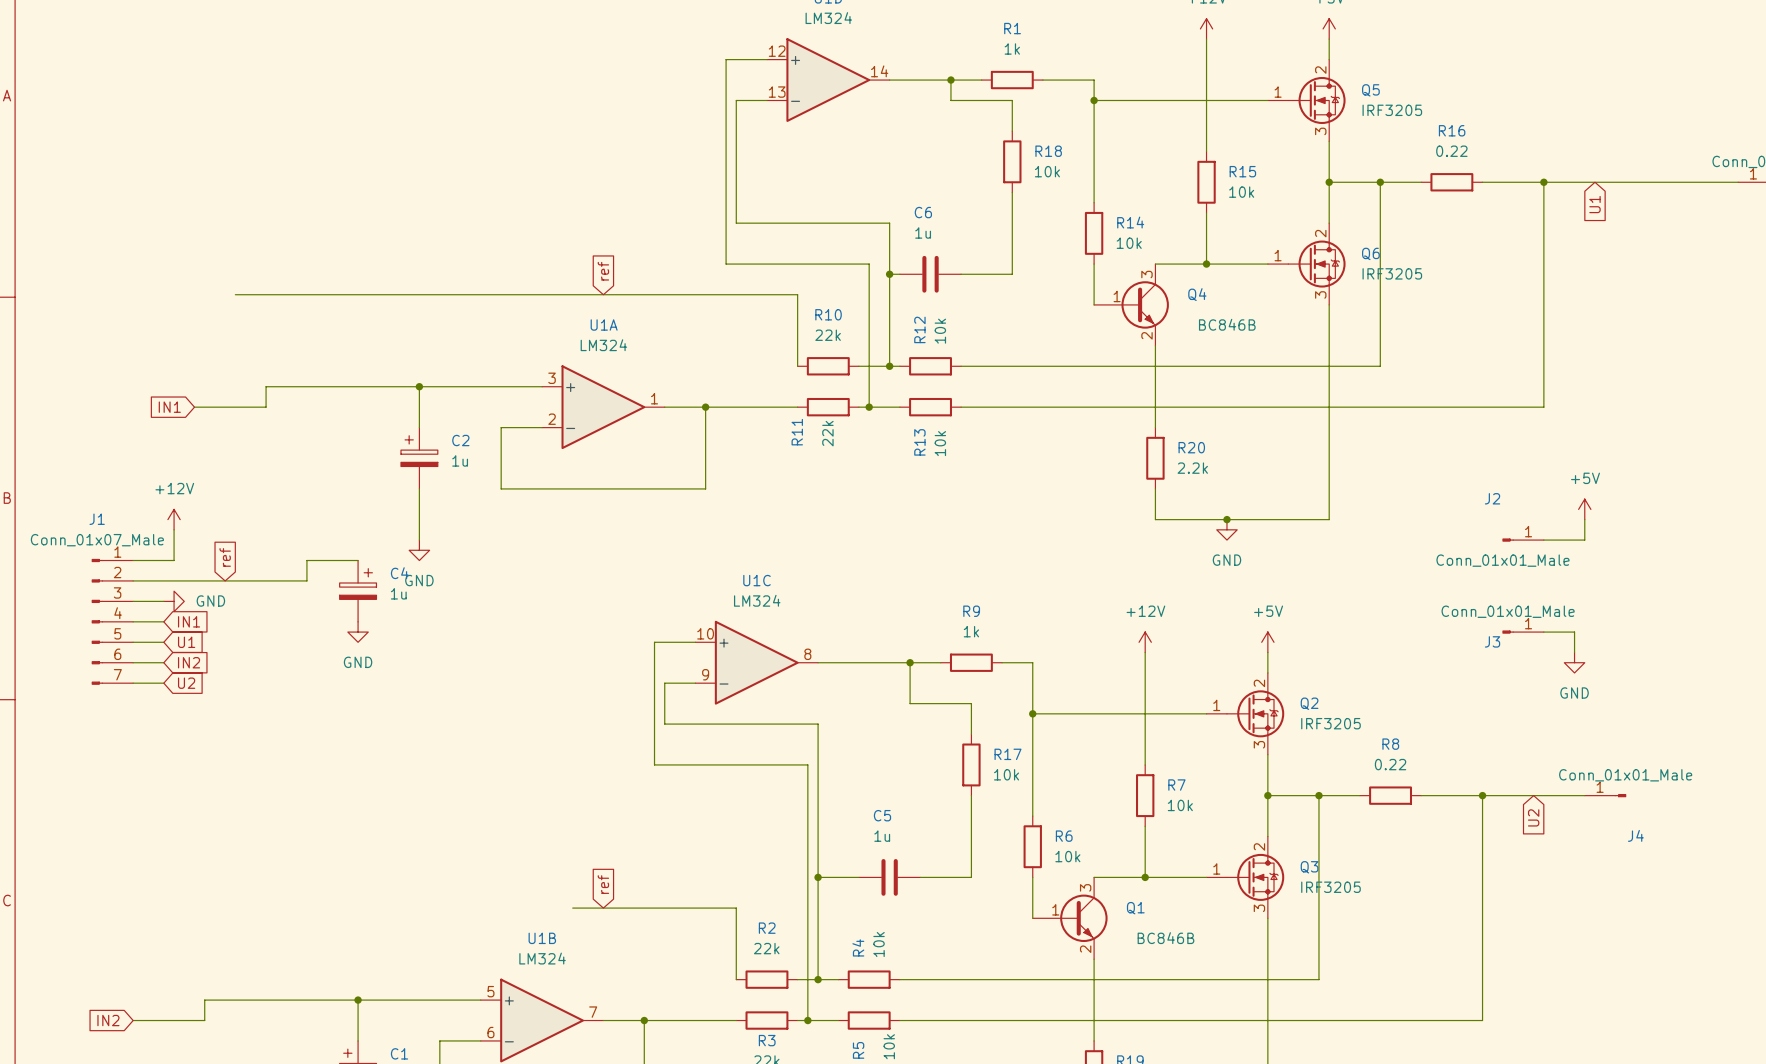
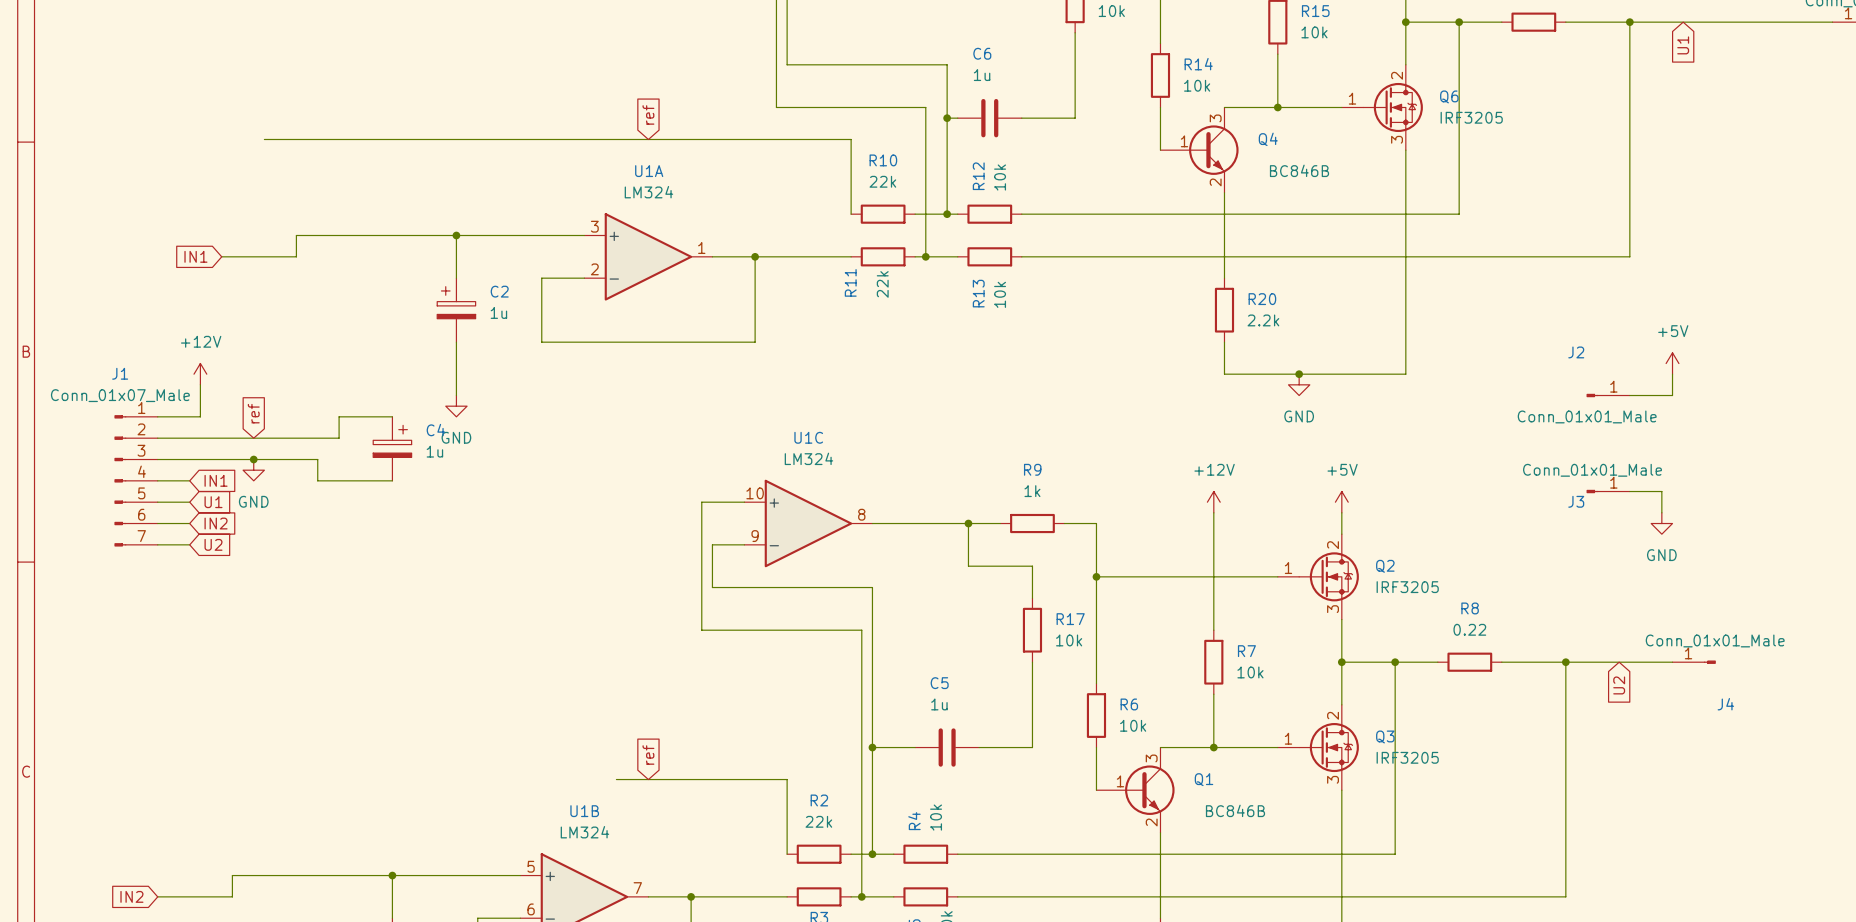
wire: none -> (189, 459) (317, 459) (317, 480) (392, 480)
power symbol rotation: 0° (174, 601) -> 90° clockwise (253, 470)
power symbol position: GND (174, 601) -> GND (253, 470)
junction: none -> (253, 459)
power symbol: GND (358, 632) -> none

